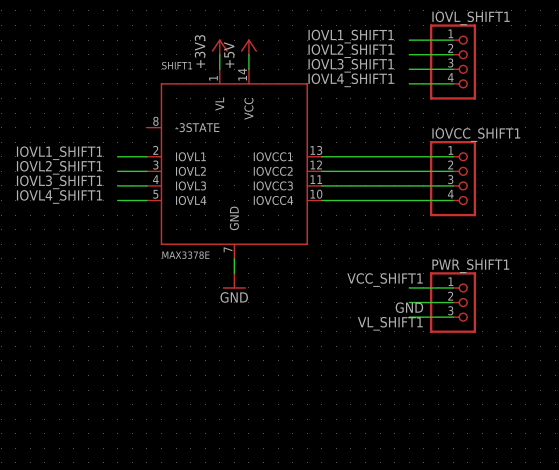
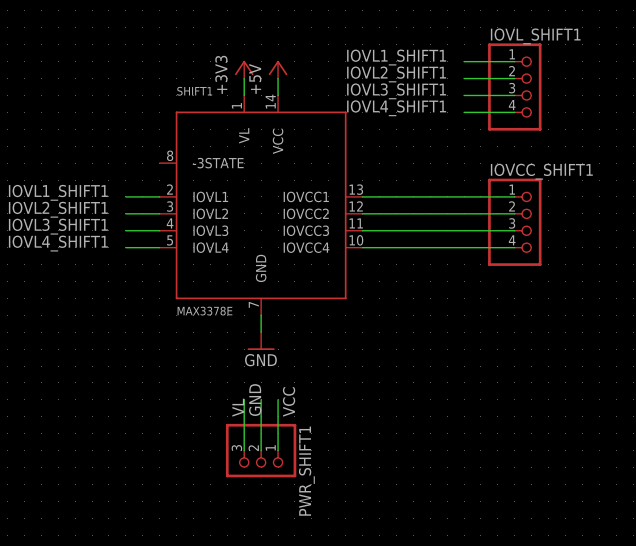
label: VCC_SHIFT1 (385, 280) -> none
wire: (409, 287) (453, 287) -> none
wire: (409, 302) (453, 302) -> none
PWR_SHIFT1 rotation: 0° (453, 302) -> 90° clockwise (261, 450)
PWR_SHIFT1 position: (453, 302) -> (261, 450)
label: GND (409, 307) -> none
wire: (409, 317) (453, 317) -> none
label: VL_SHIFT1 (390, 323) -> none
wire: none -> (244, 399) (244, 450)
label: none -> GND (255, 400)
wire: none -> (261, 399) (261, 450)
wire: none -> (278, 399) (278, 450)
label: none -> VCC (289, 401)
label: none -> VL (238, 407)

